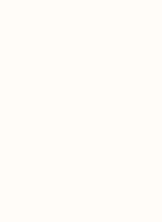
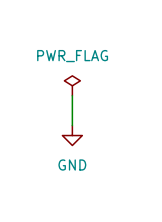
power symbol: none -> PWR_FLAG (72, 85)
wire: none -> (72, 95) (72, 125)
power symbol: none -> GND (72, 135)

